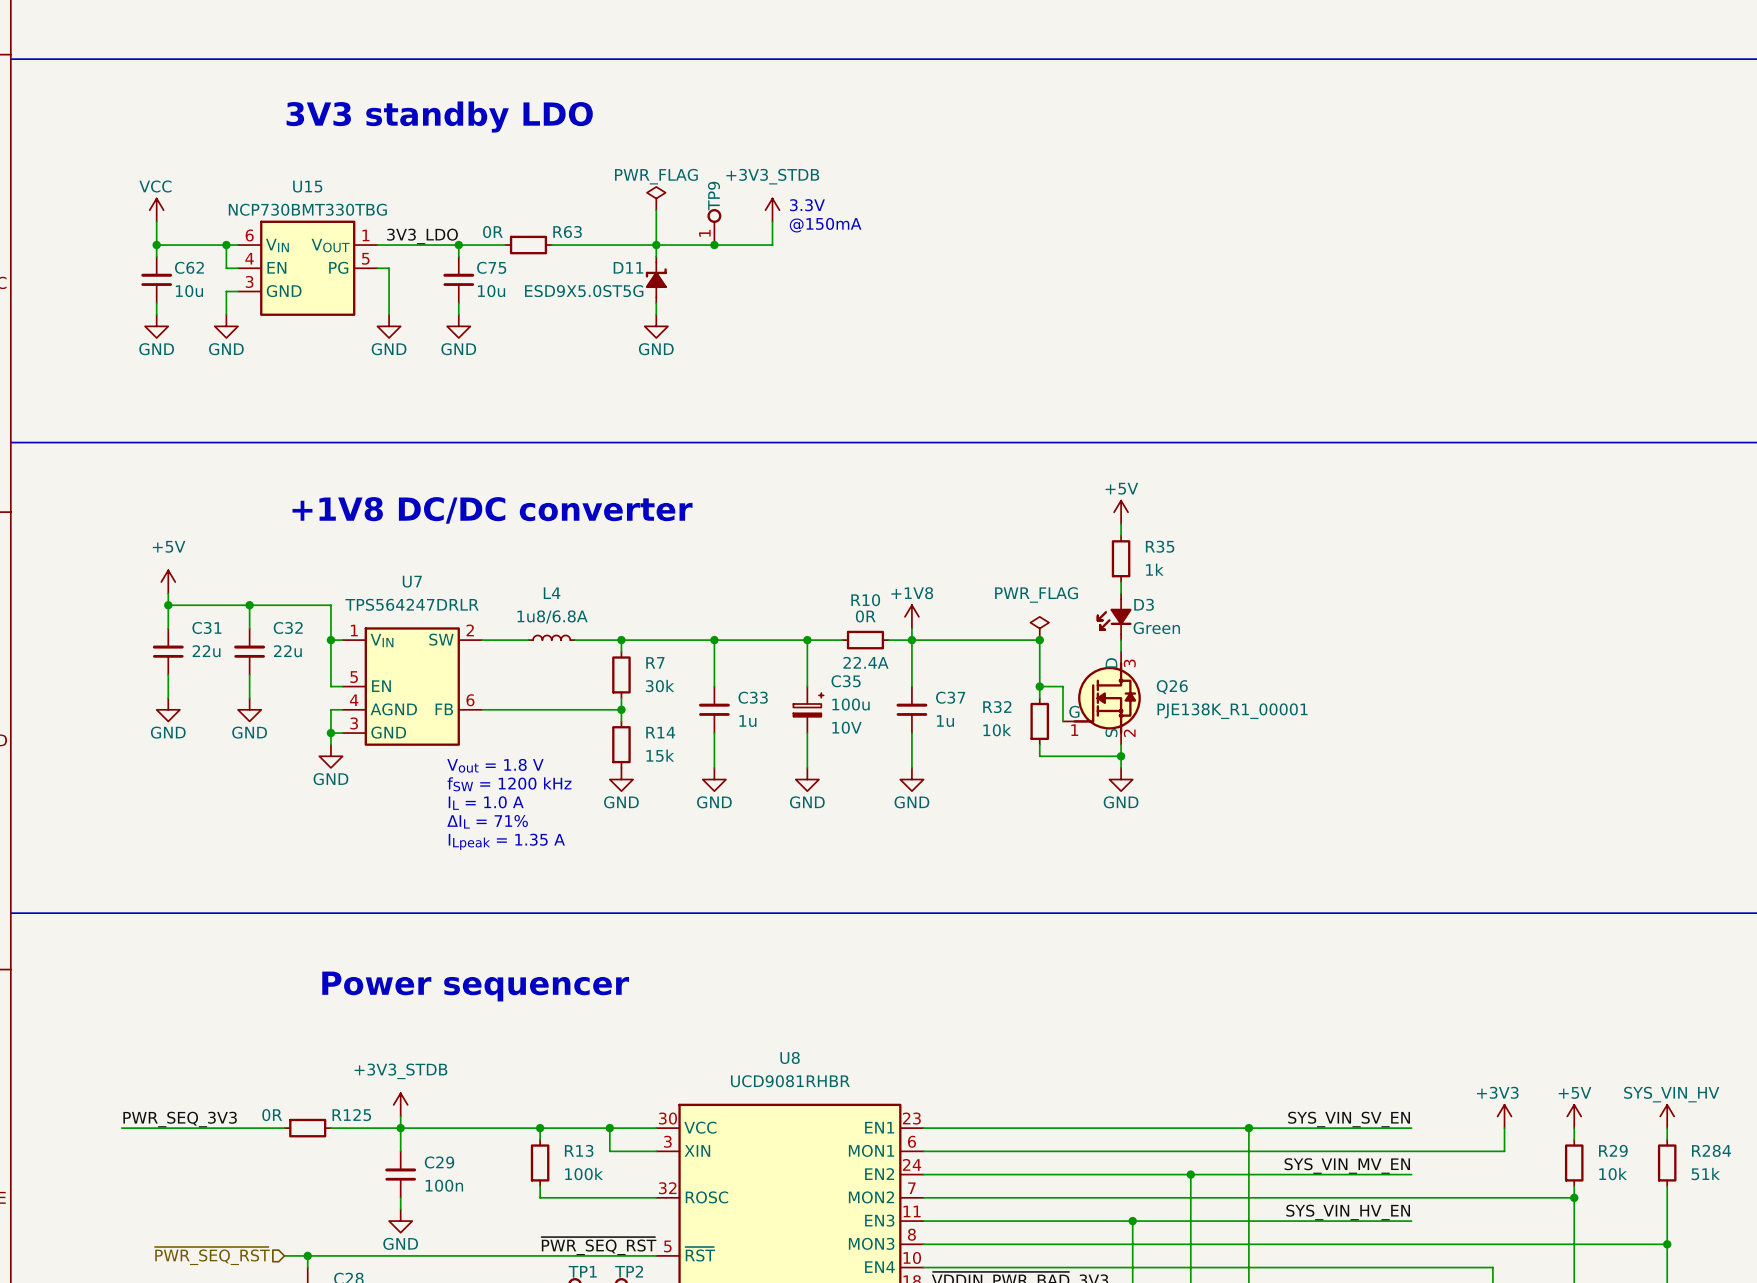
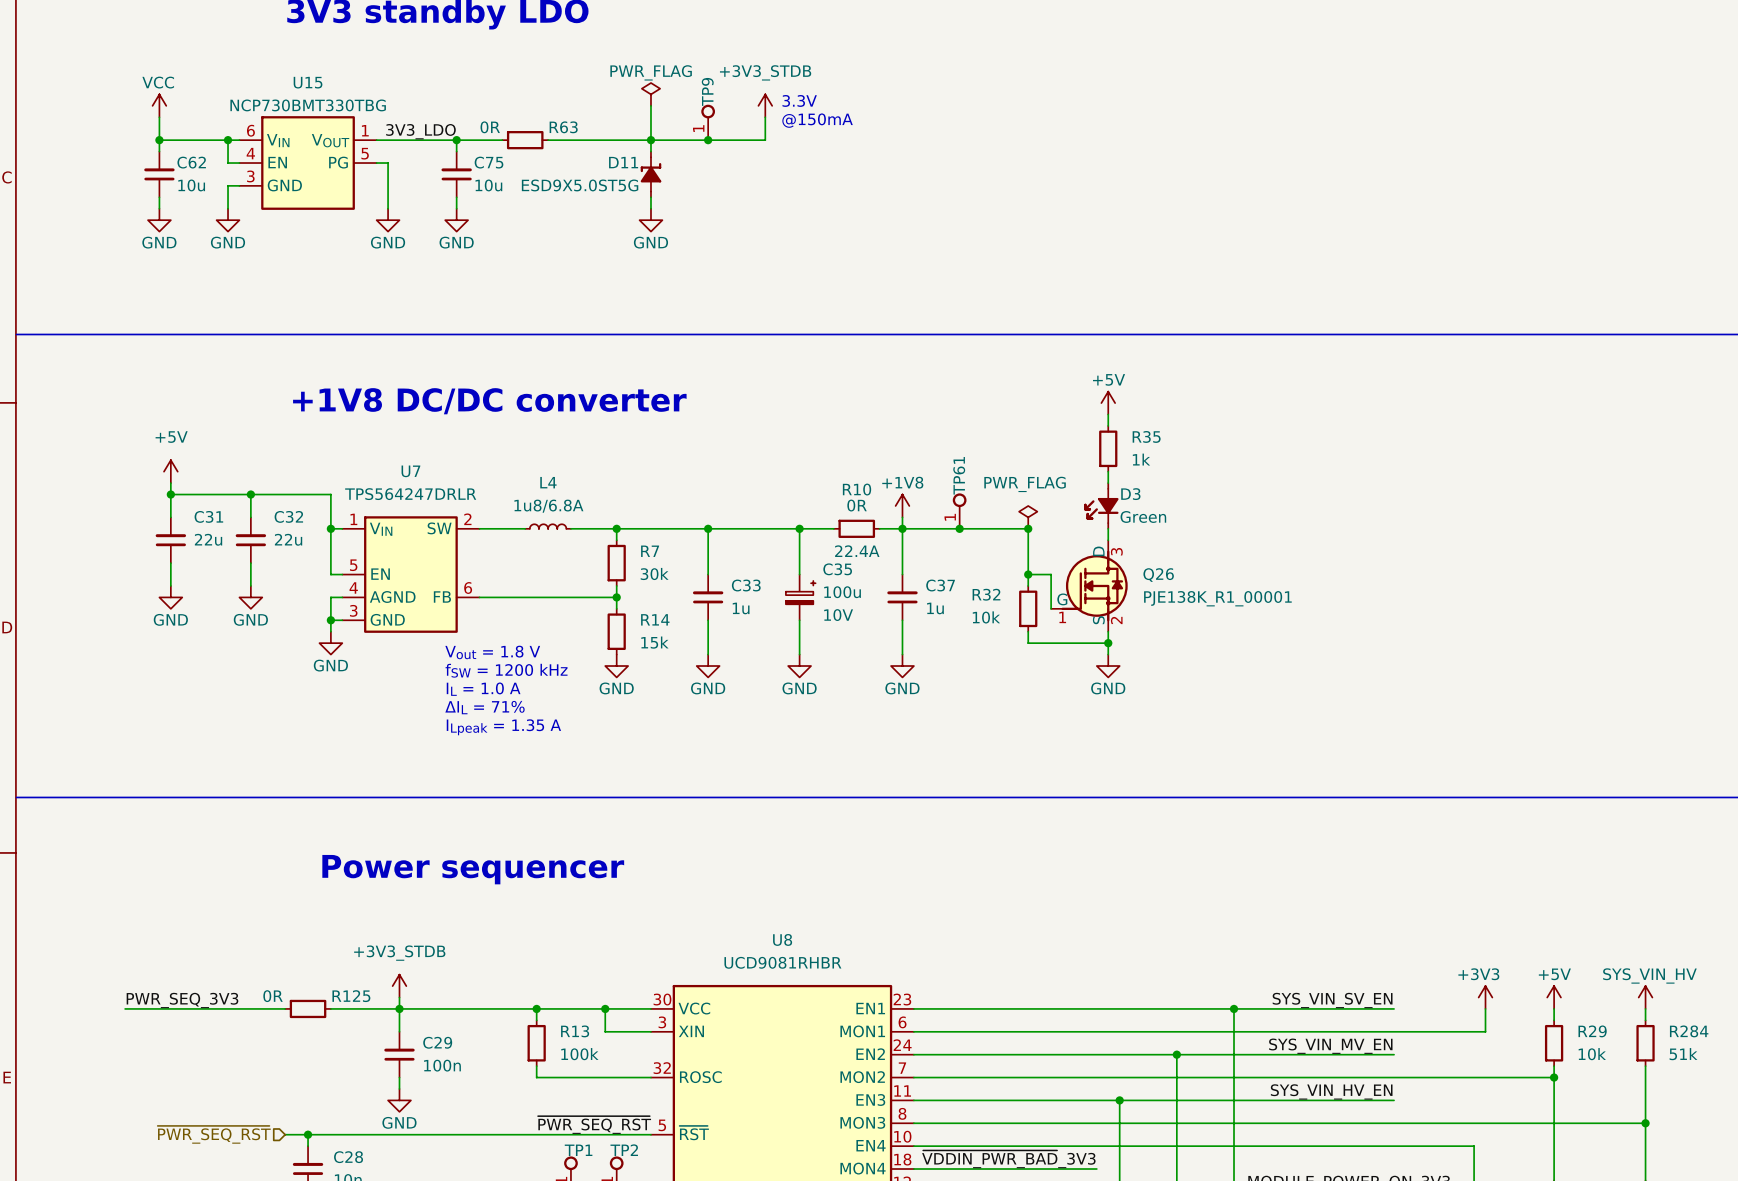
TP61: none -> (959, 511)
junction: none -> (959, 528)

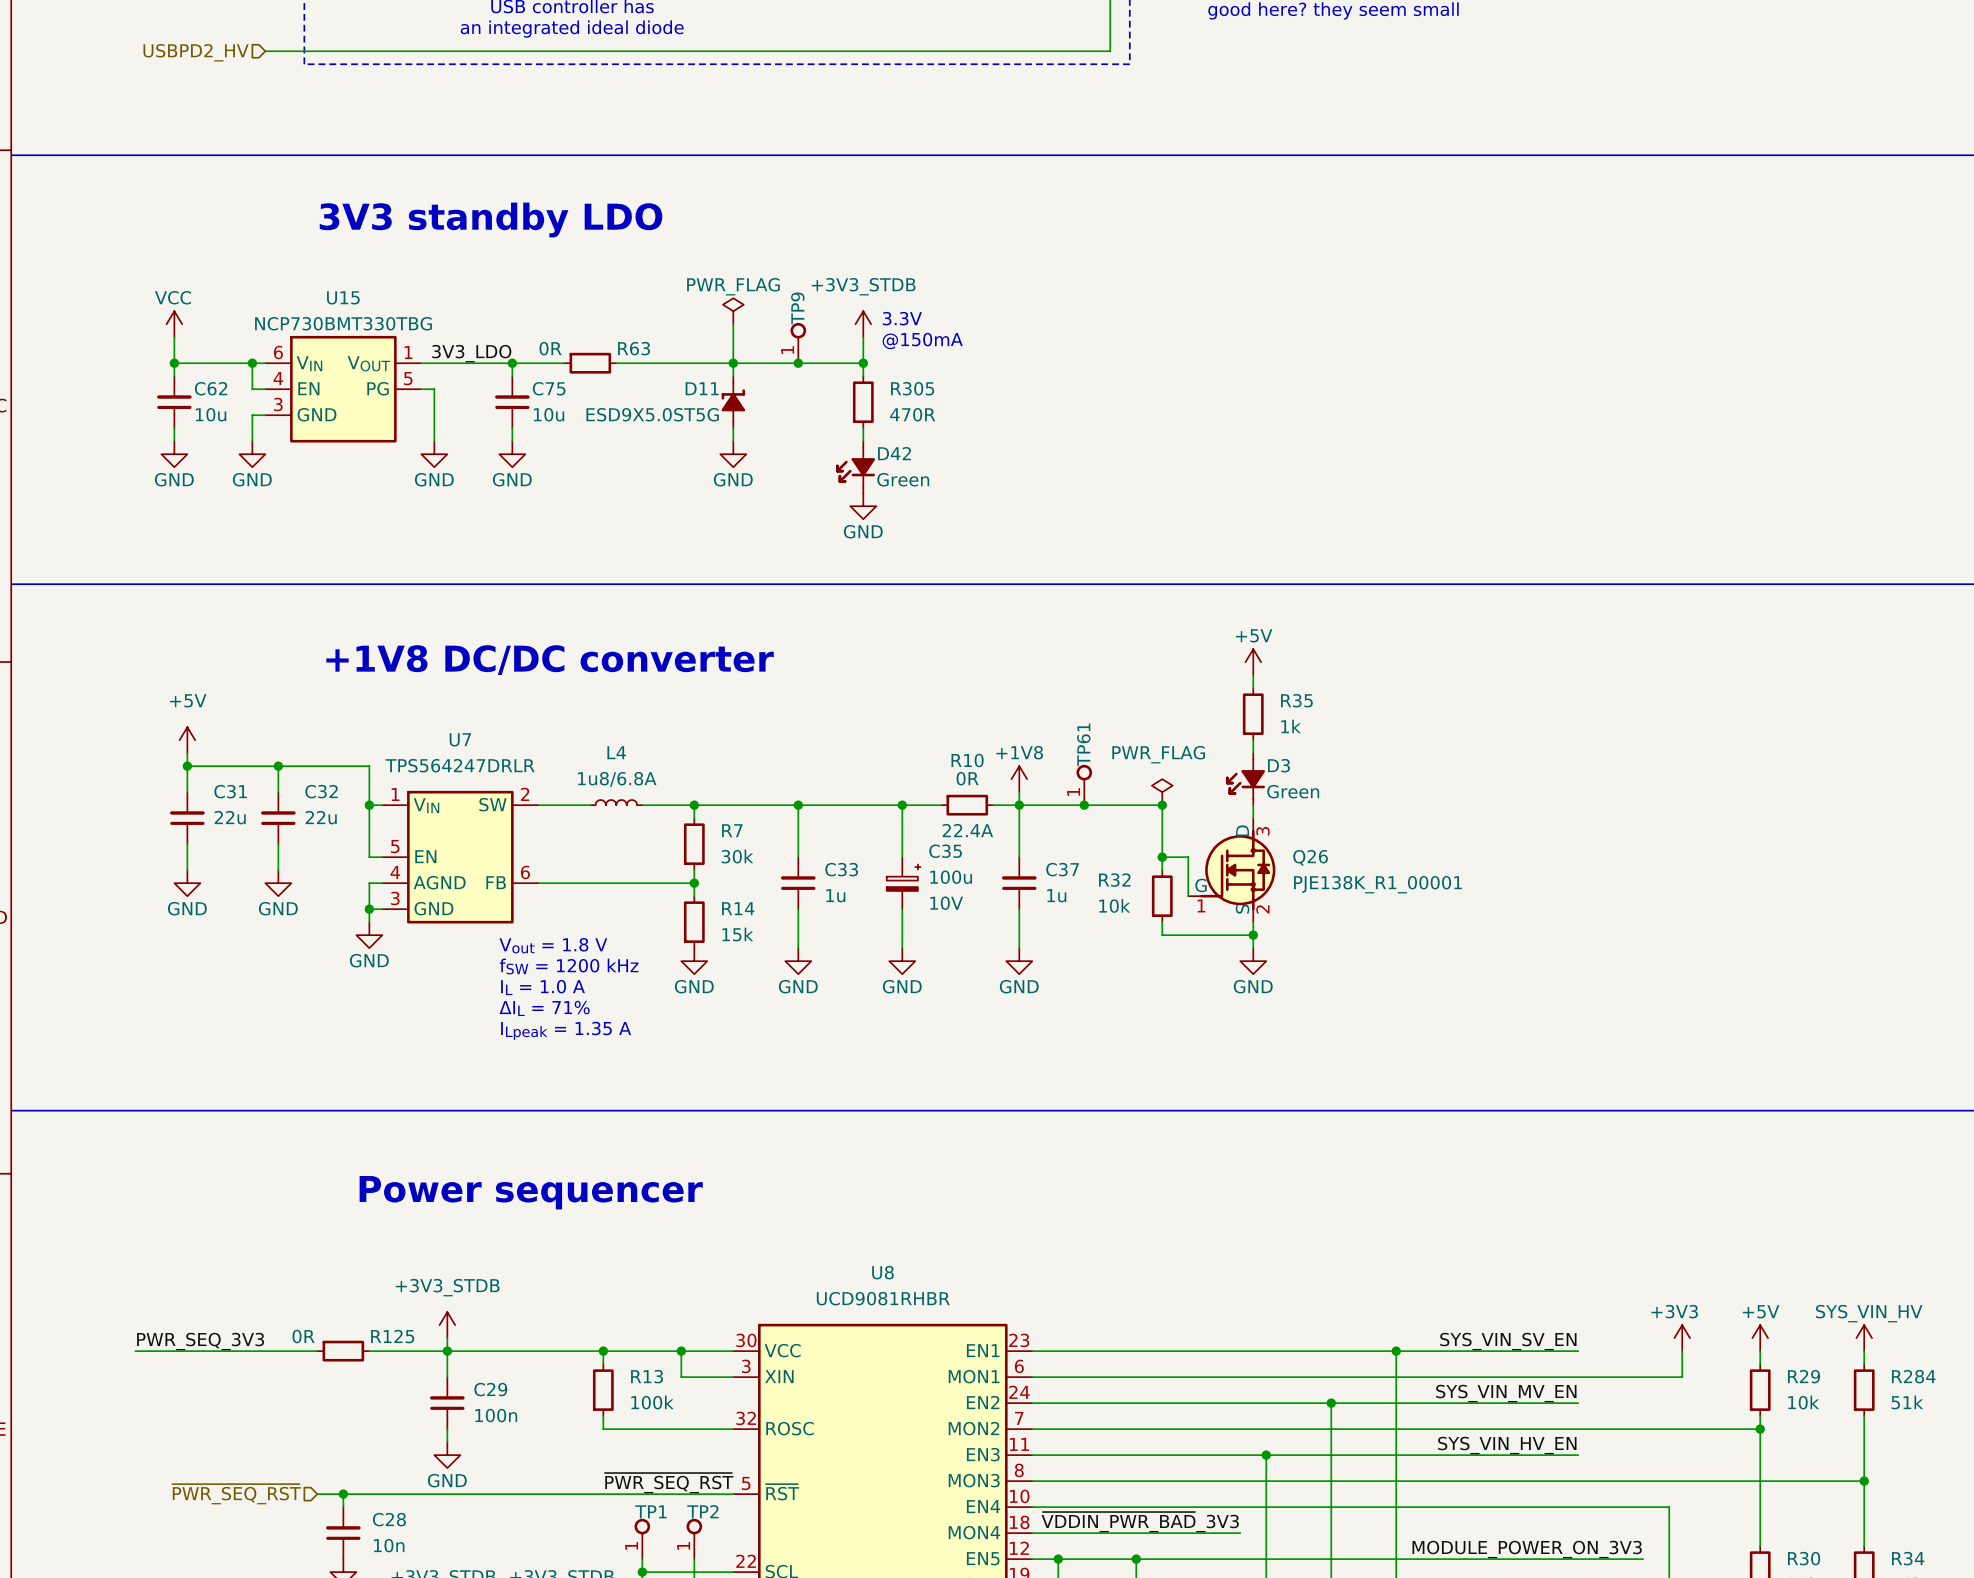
wire: none -> (863, 363) (863, 376)
junction: none -> (863, 363)
R305: none -> (863, 402)
wire: none -> (863, 428) (863, 441)
D42: none -> (855, 467)
power symbol: none -> GND (863, 506)

